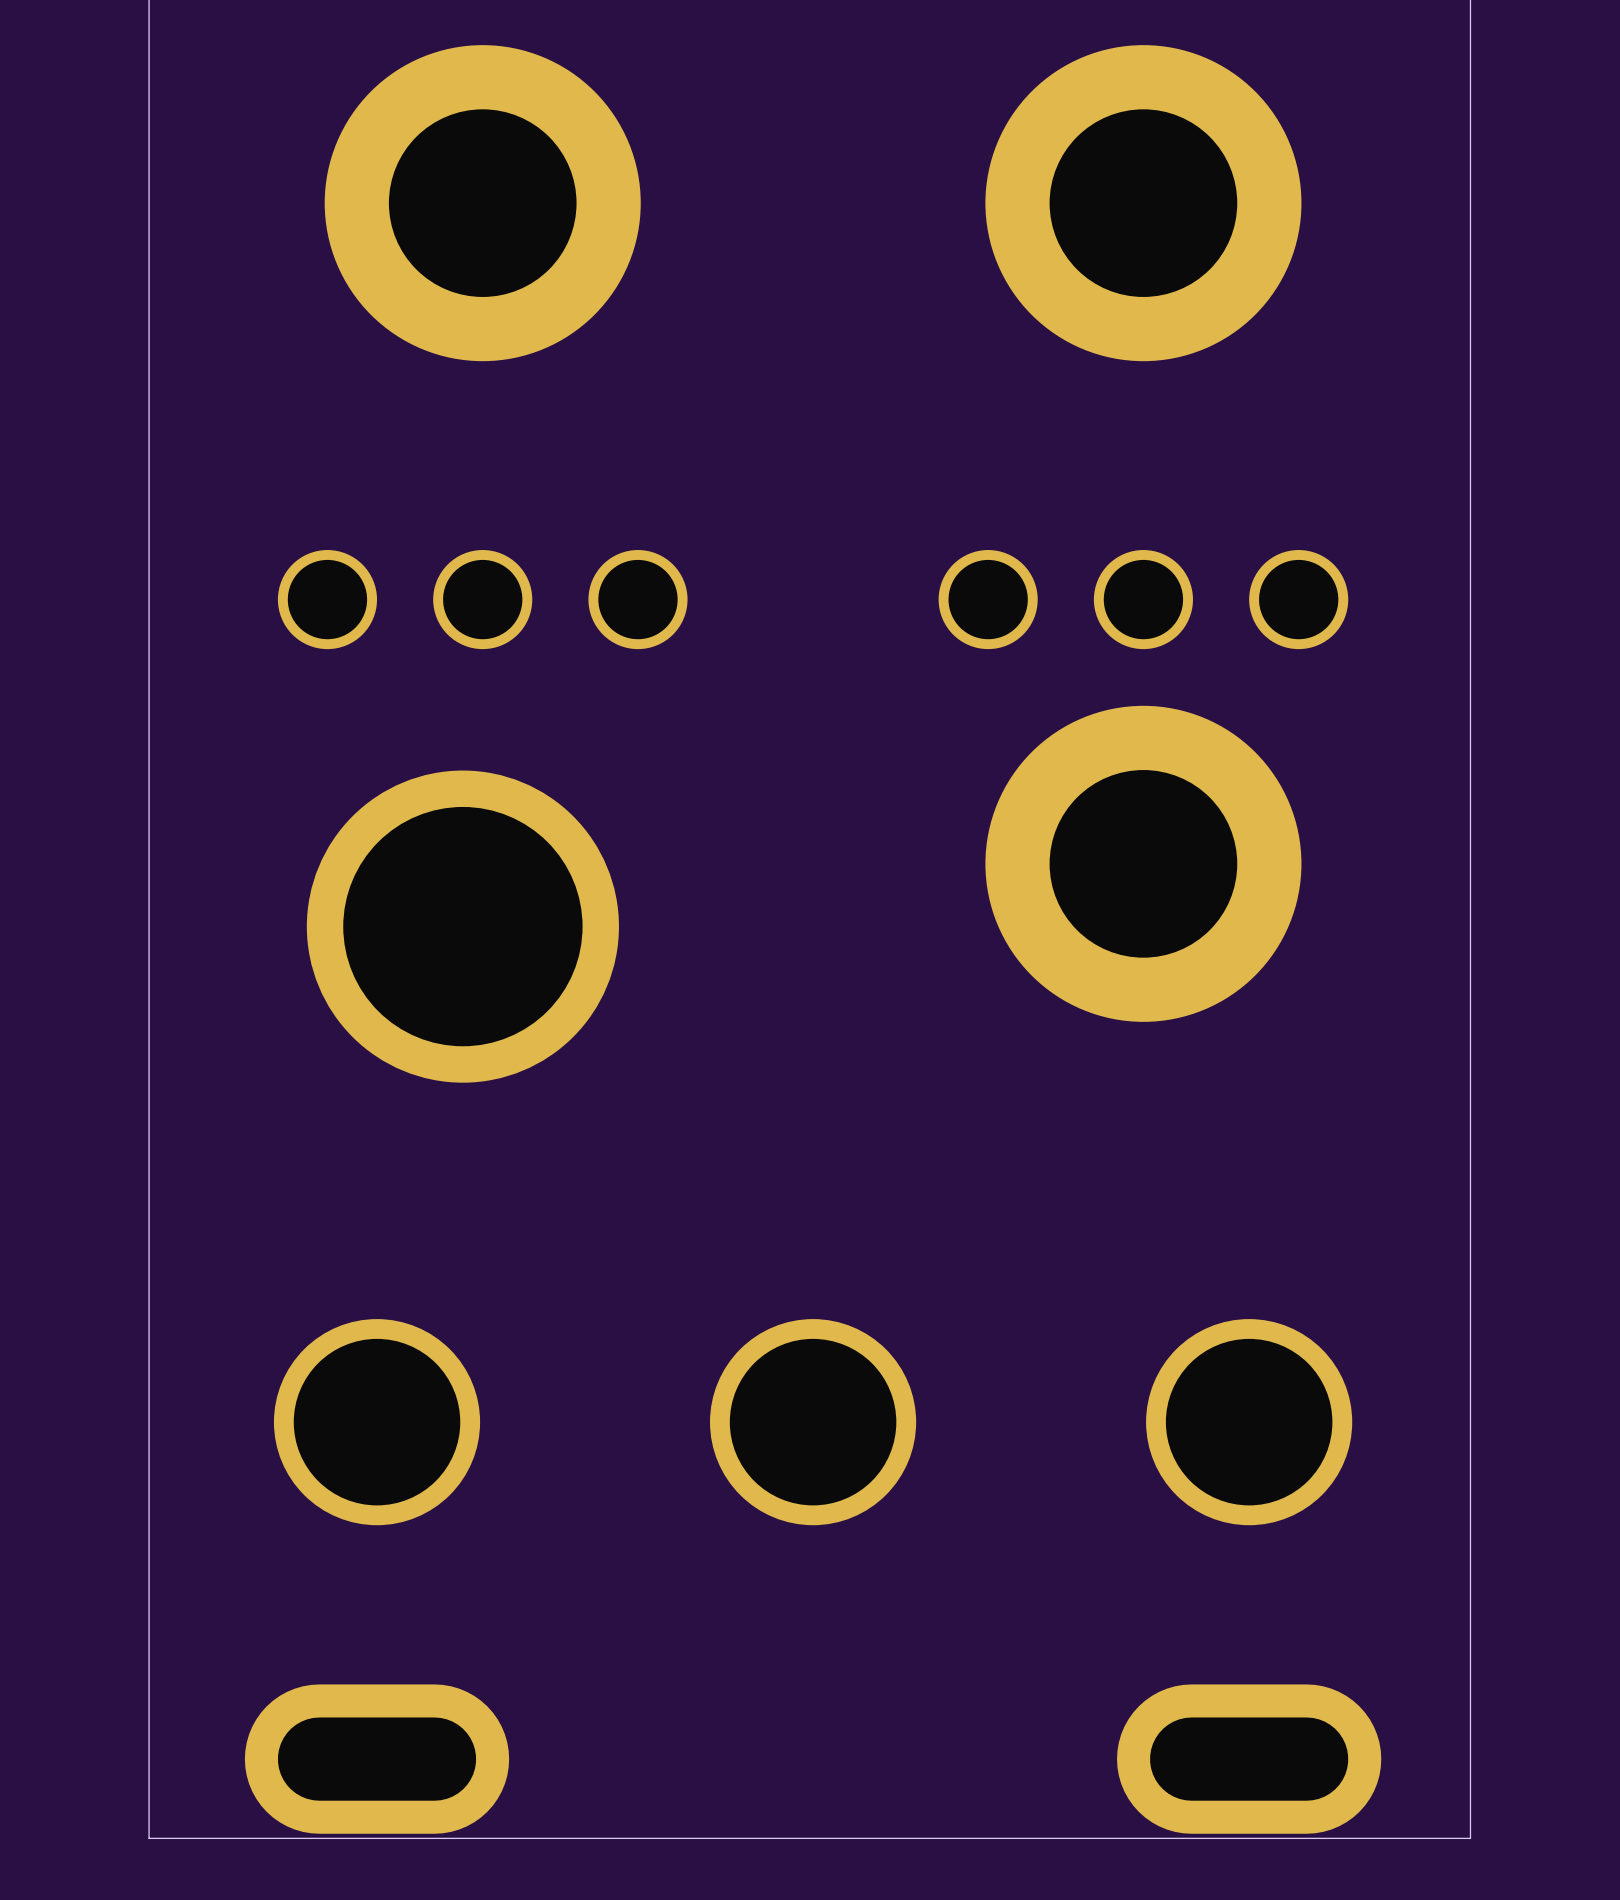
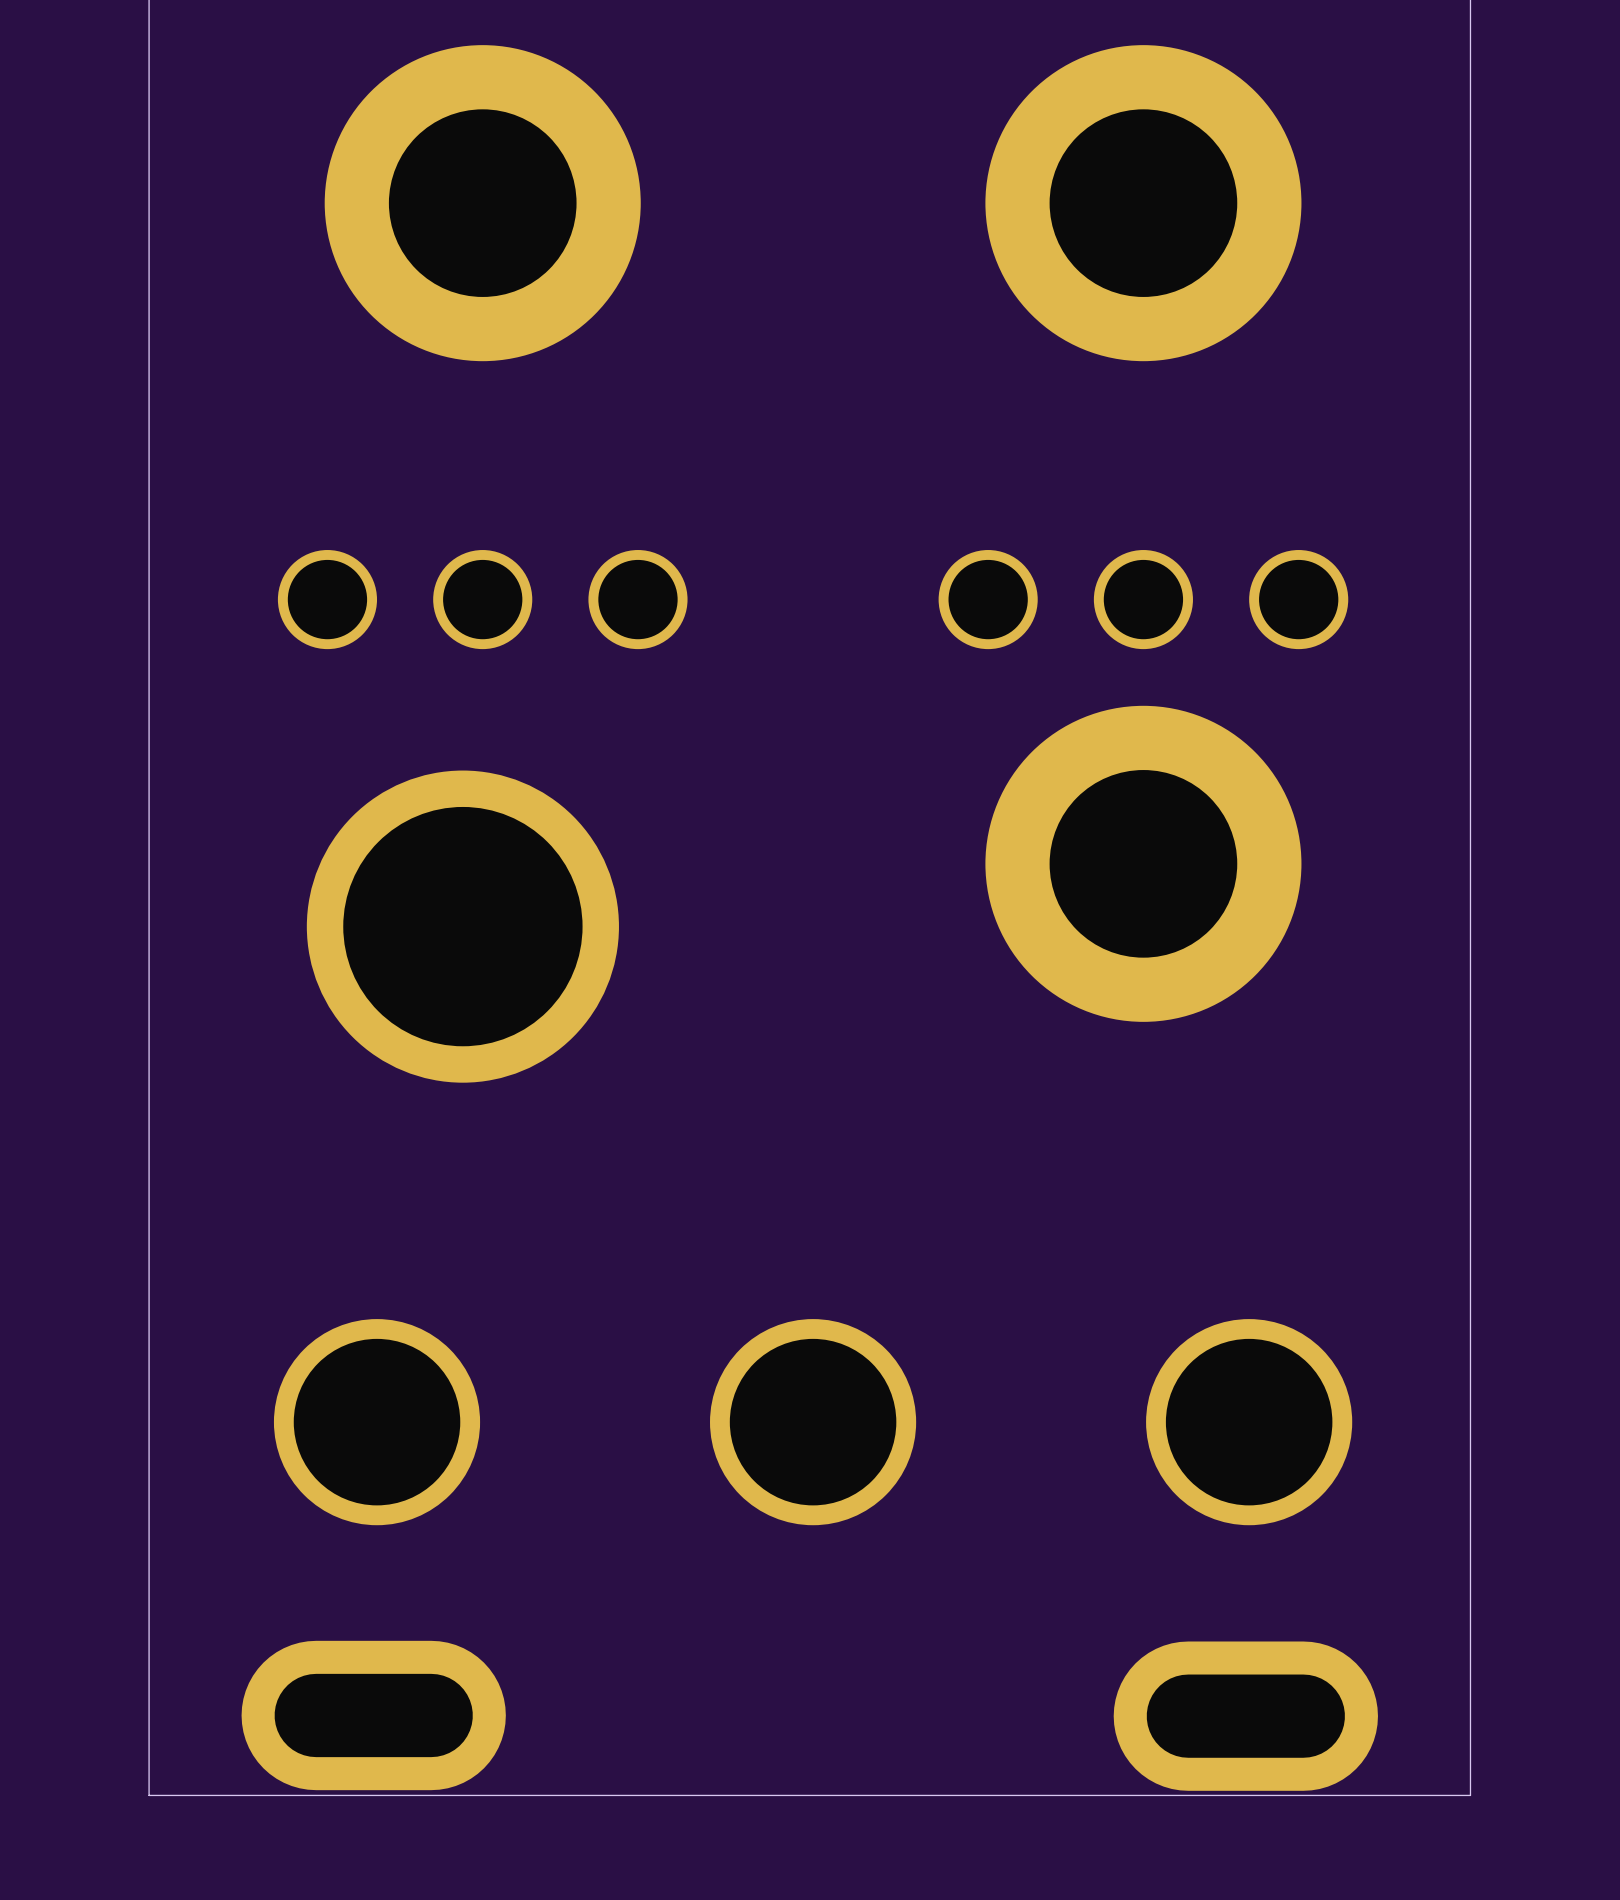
part position: (377, 1759) -> (373, 1715)
part position: (1249, 1759) -> (1245, 1716)
board edge: (1470, 1795) (1470, 1838) (149, 1838) (149, 1795) -> (1470, 1795) (149, 1795)

